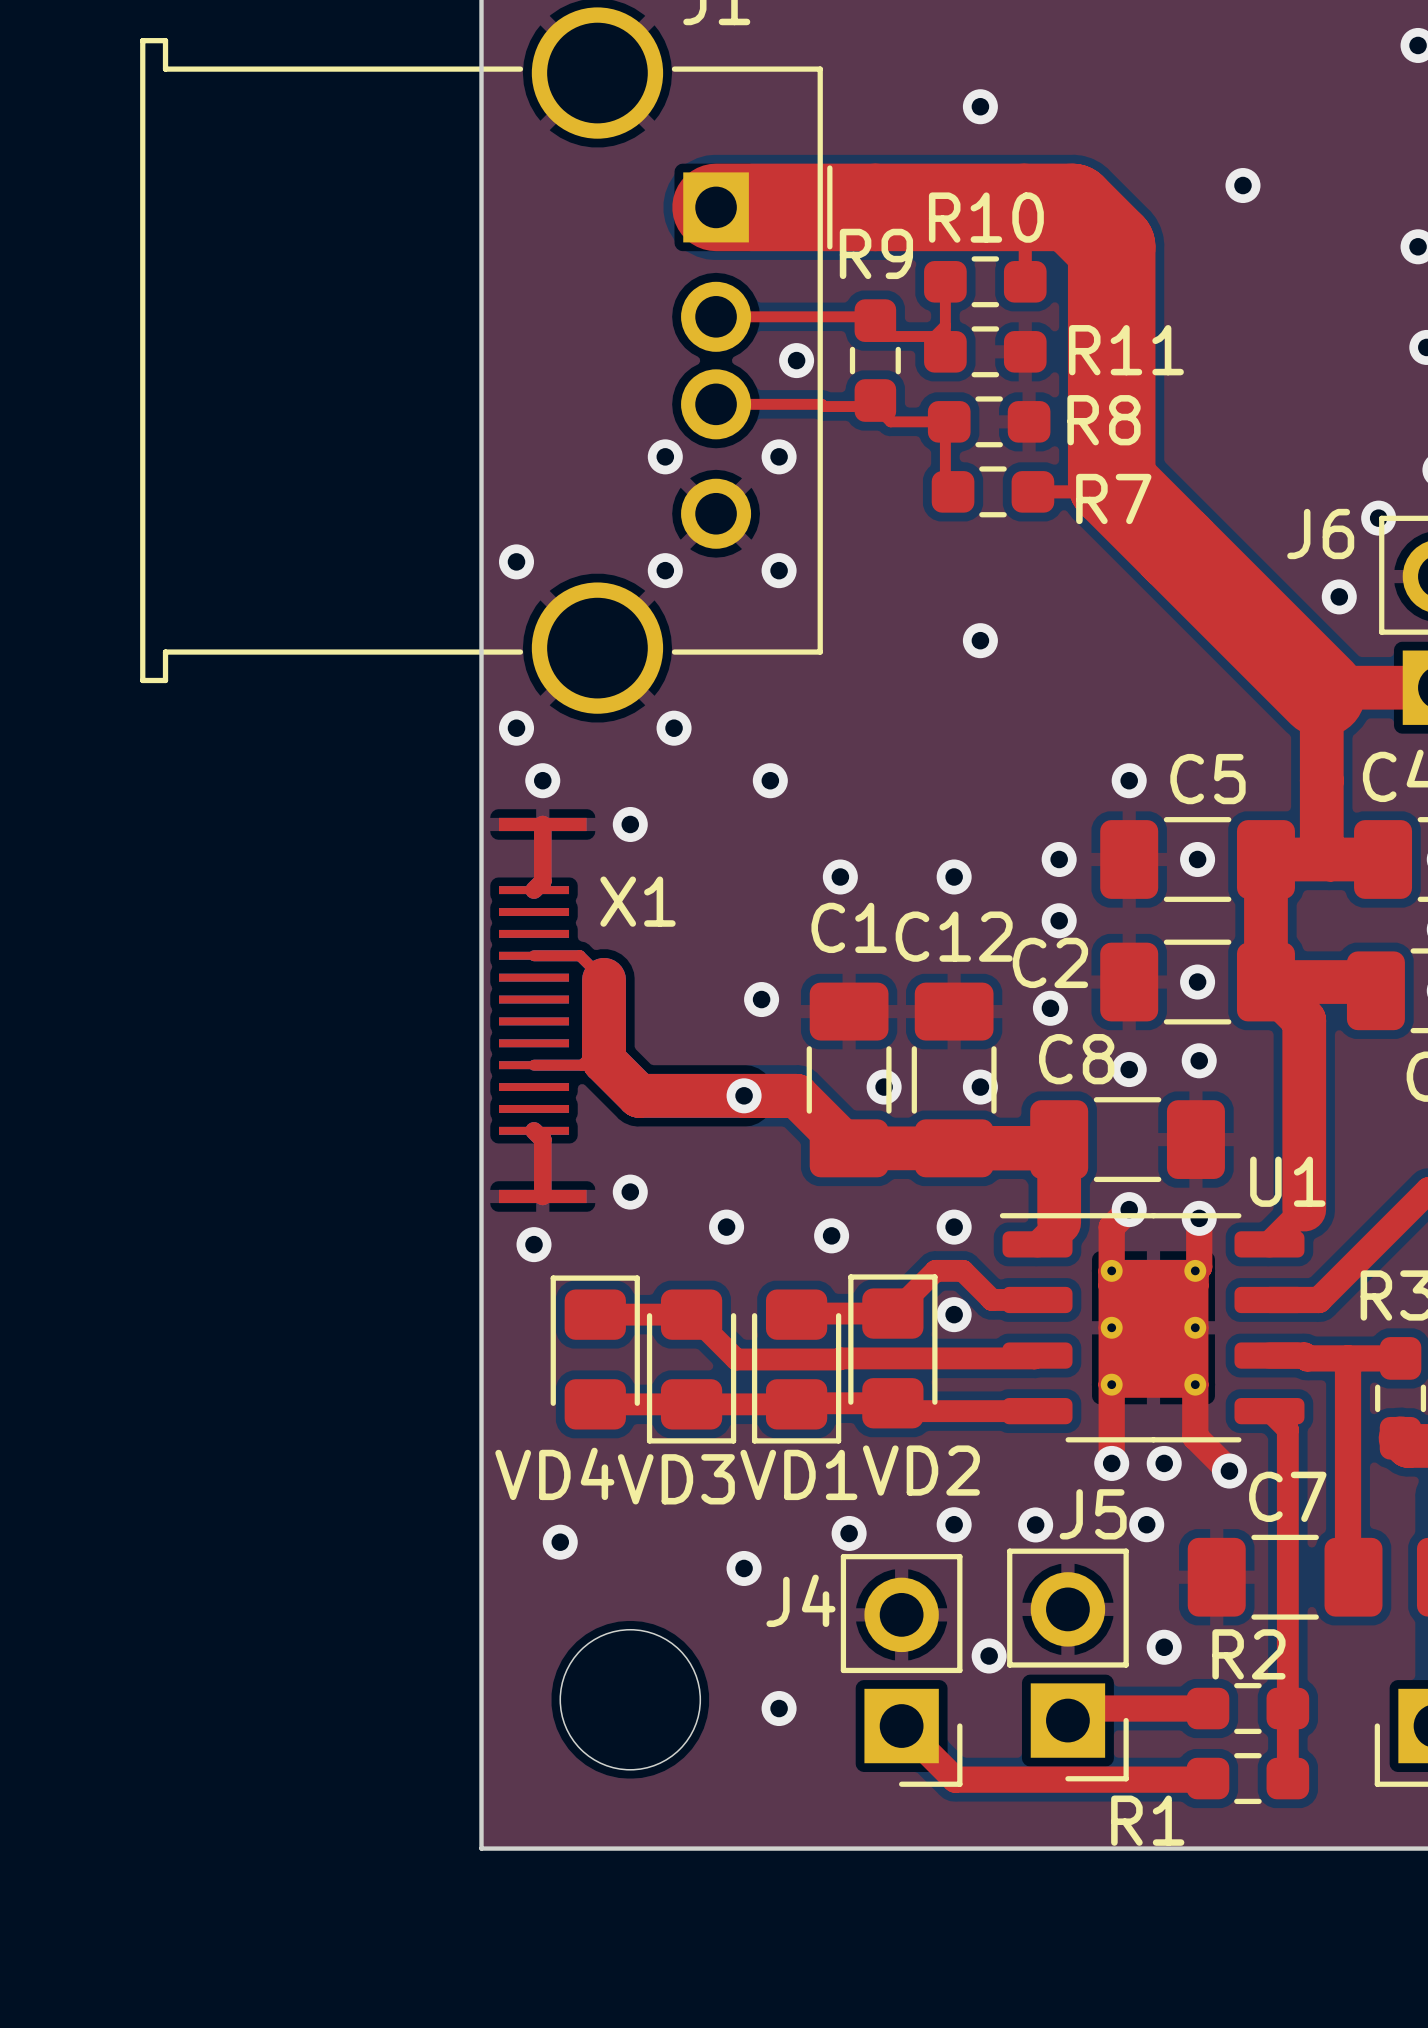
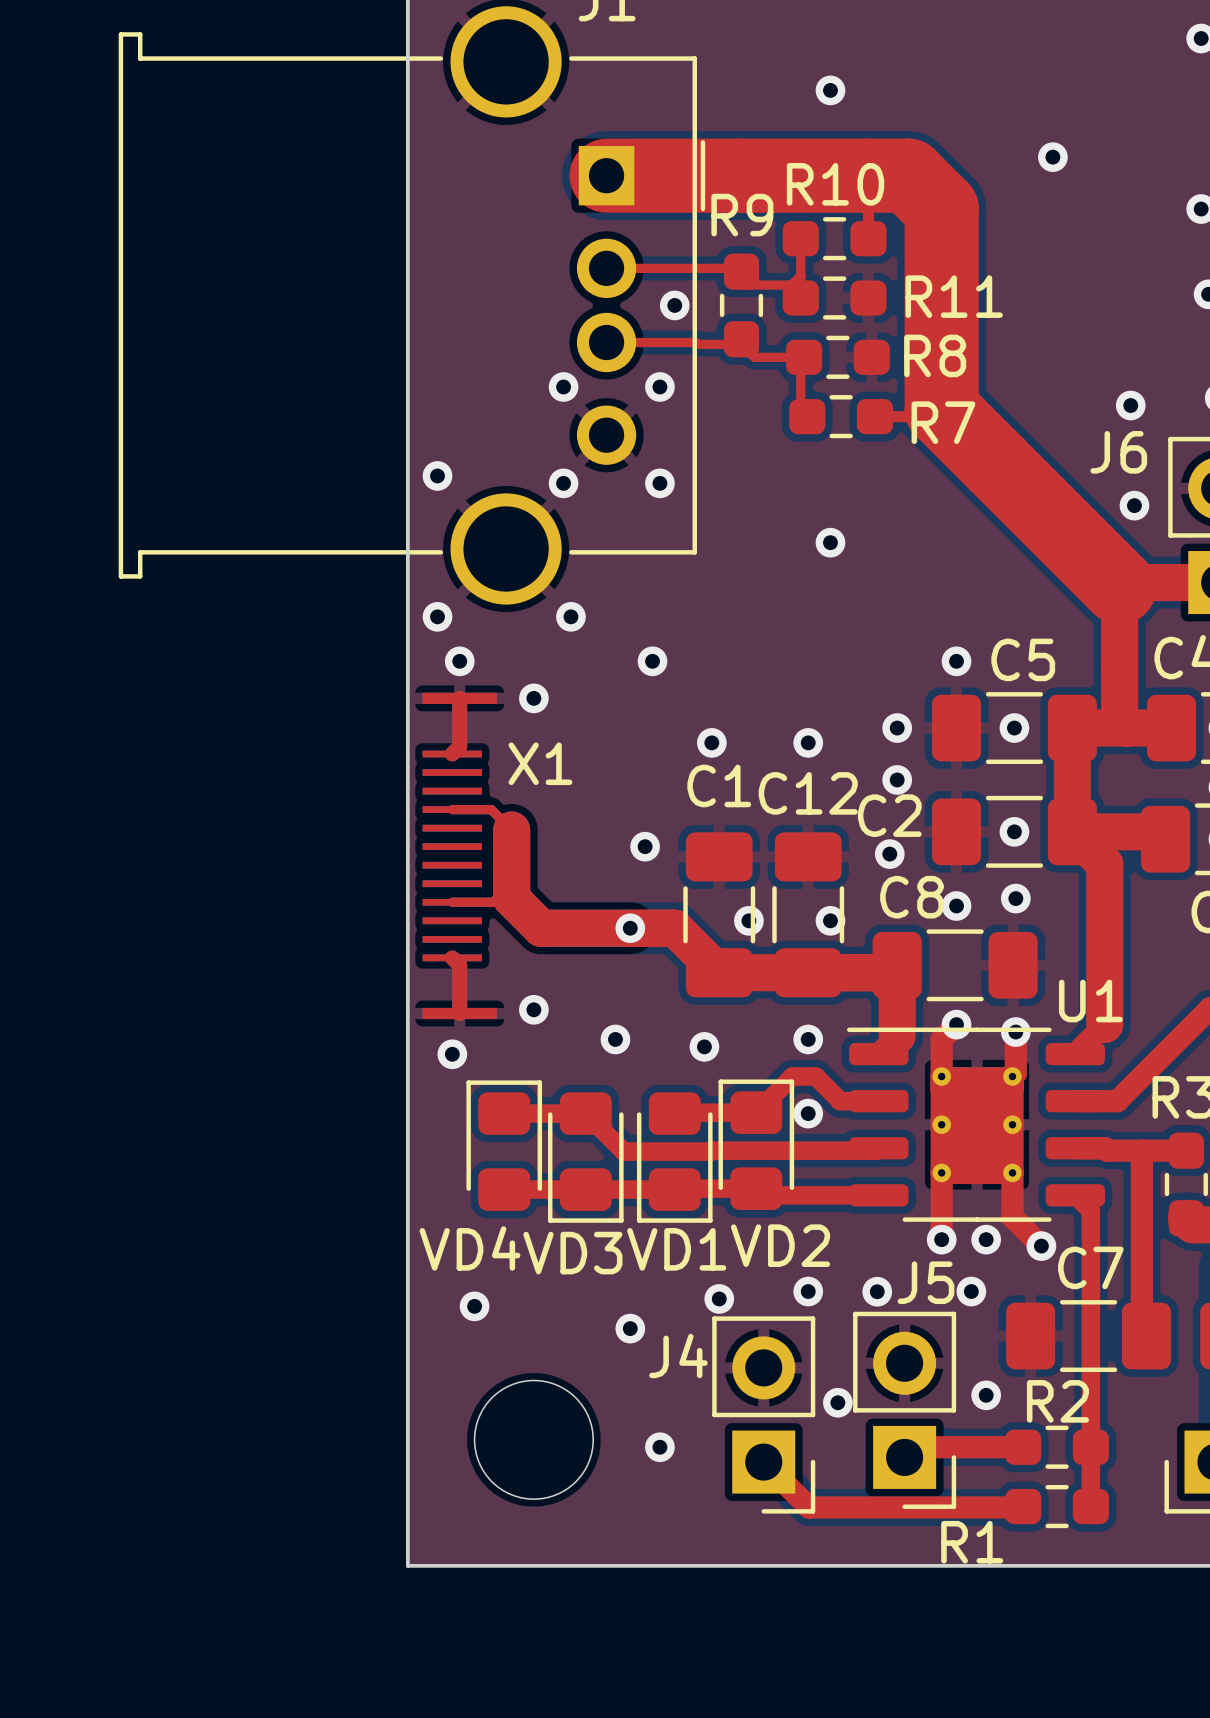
via position: (1378, 518) -> (1130, 405)

